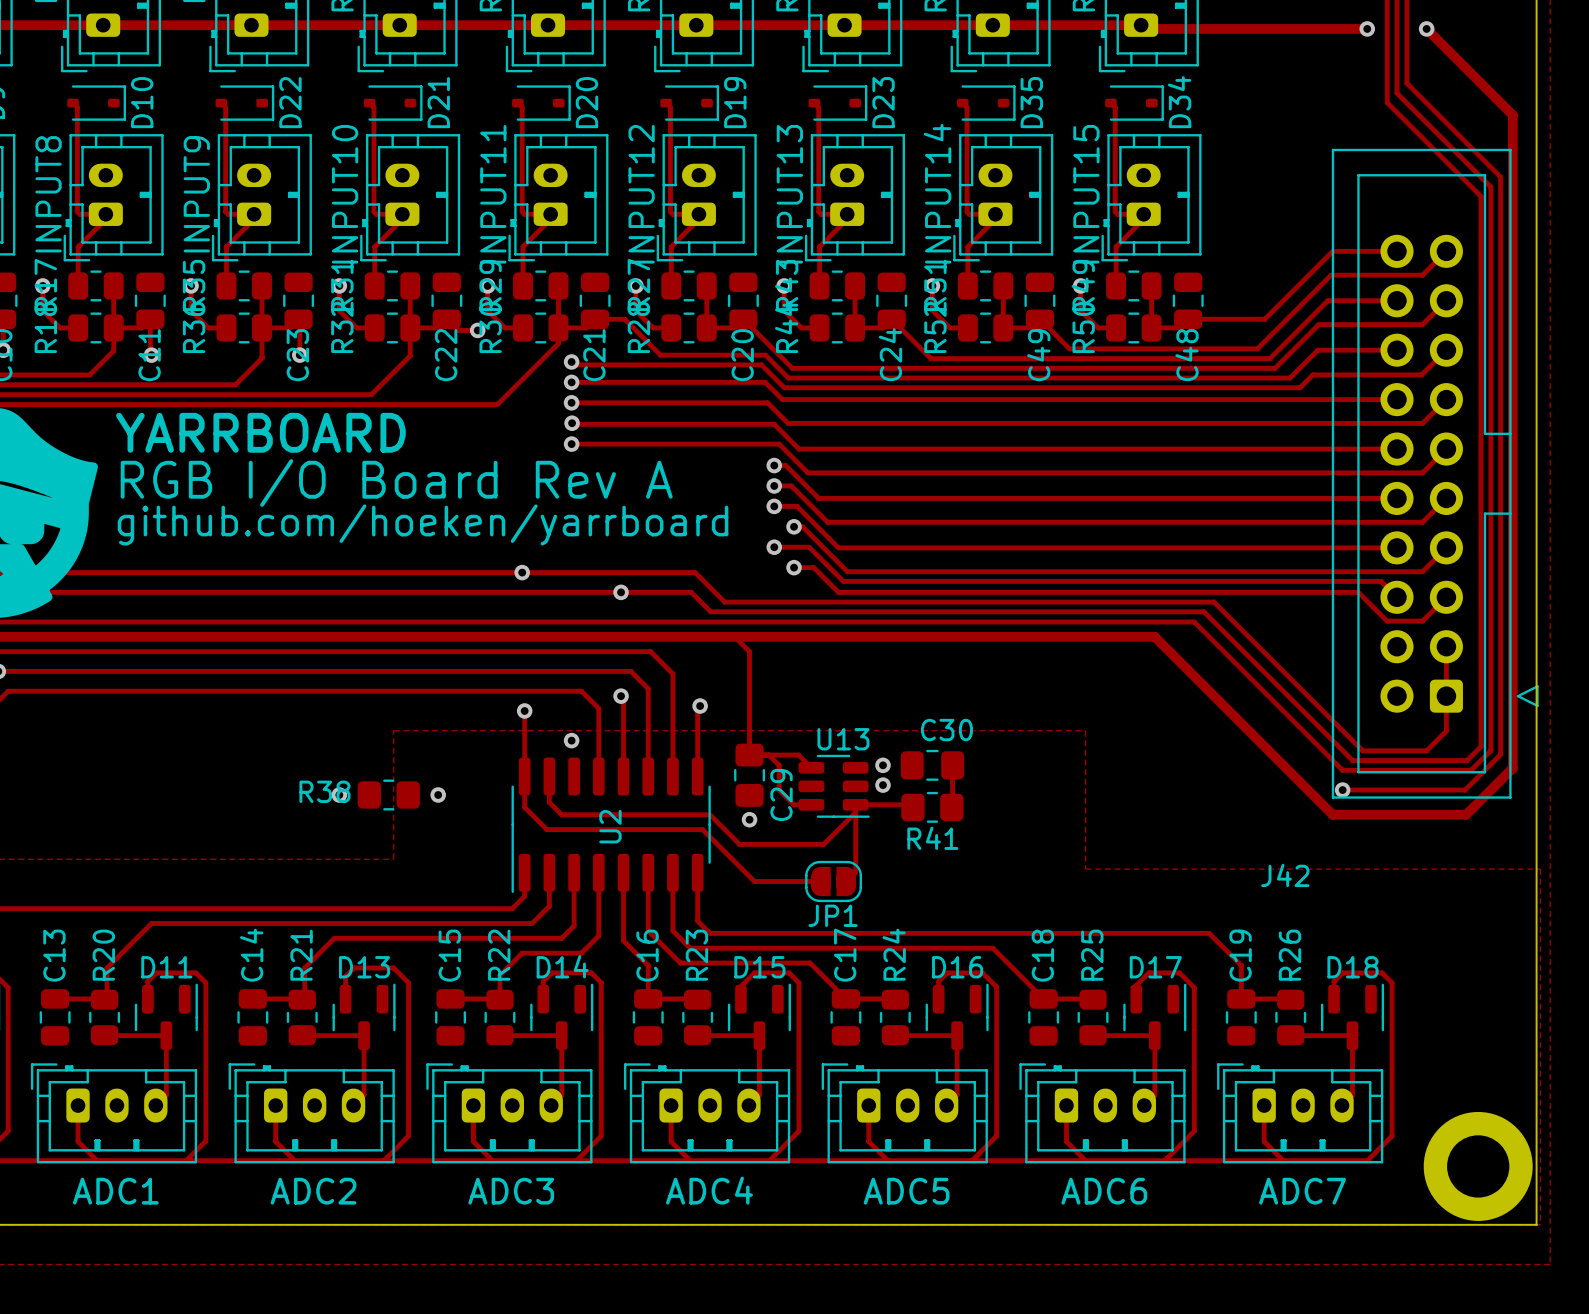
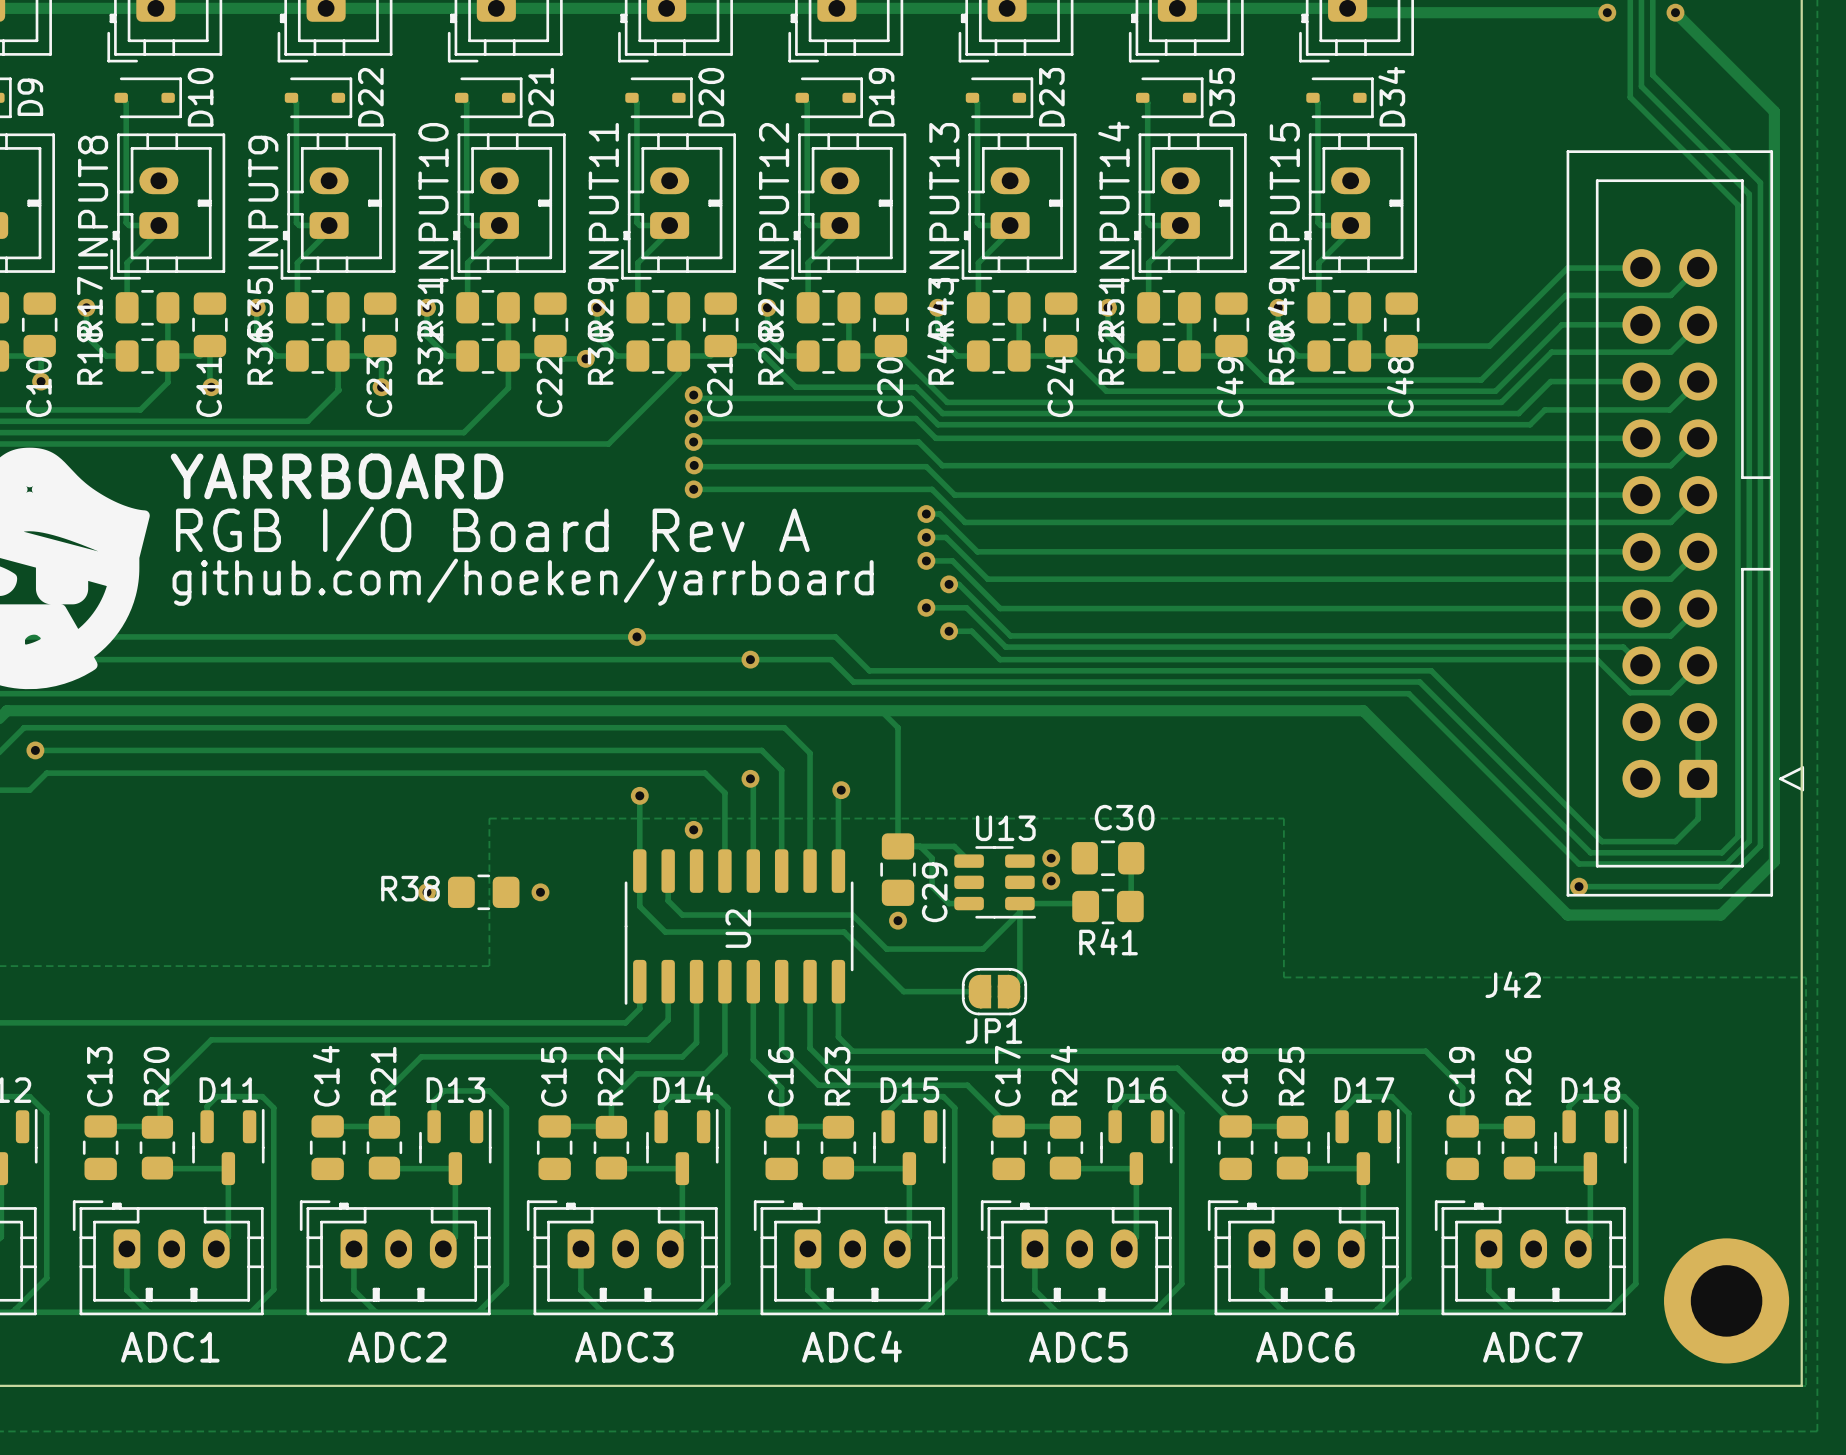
part position: (1478, 1166) -> (1726, 1300)

